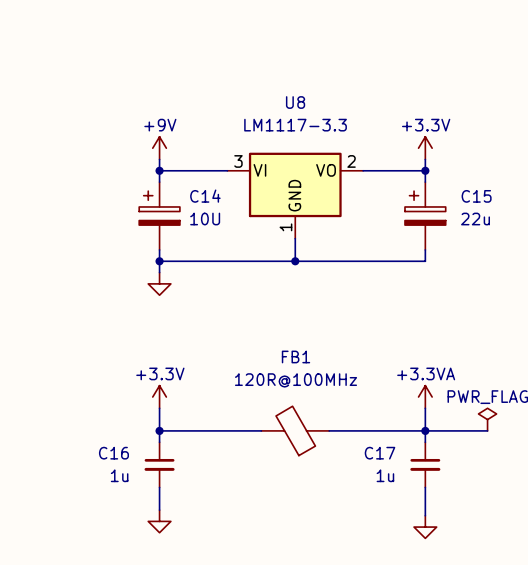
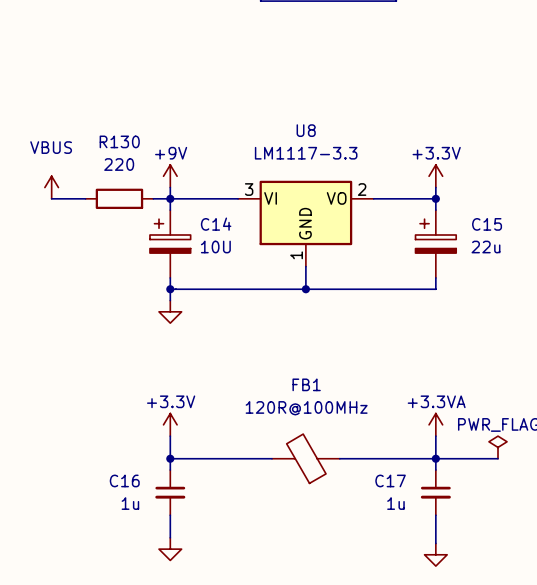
power symbol: none -> VBUS (51, 187)
wire: none -> (51, 198) (85, 198)
R130: none -> 220 (119, 198)
wire: none -> (153, 198) (170, 198)

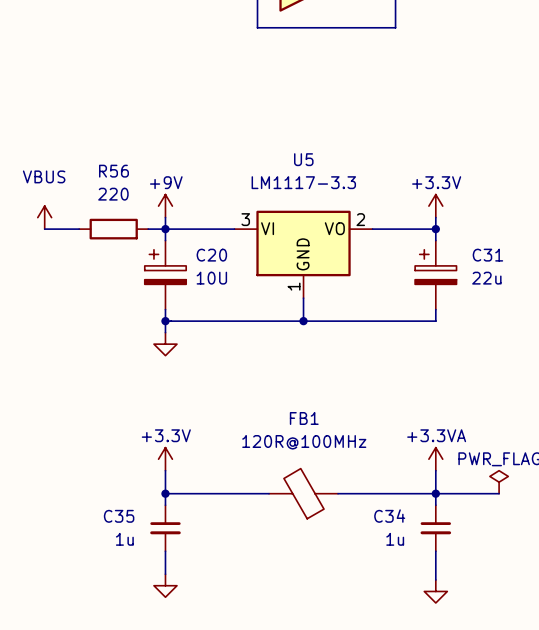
U8 name: U8 (306, 130) -> U5 (303, 159)
R130 name: R130 (119, 141) -> R56 (113, 171)
C14 name: C14 (216, 224) -> C20 (211, 255)
C15 name: C15 (487, 224) -> C31 (487, 255)
C16 name: C16 (124, 480) -> C35 (119, 516)
C17 name: C17 (390, 480) -> C34 (389, 516)

